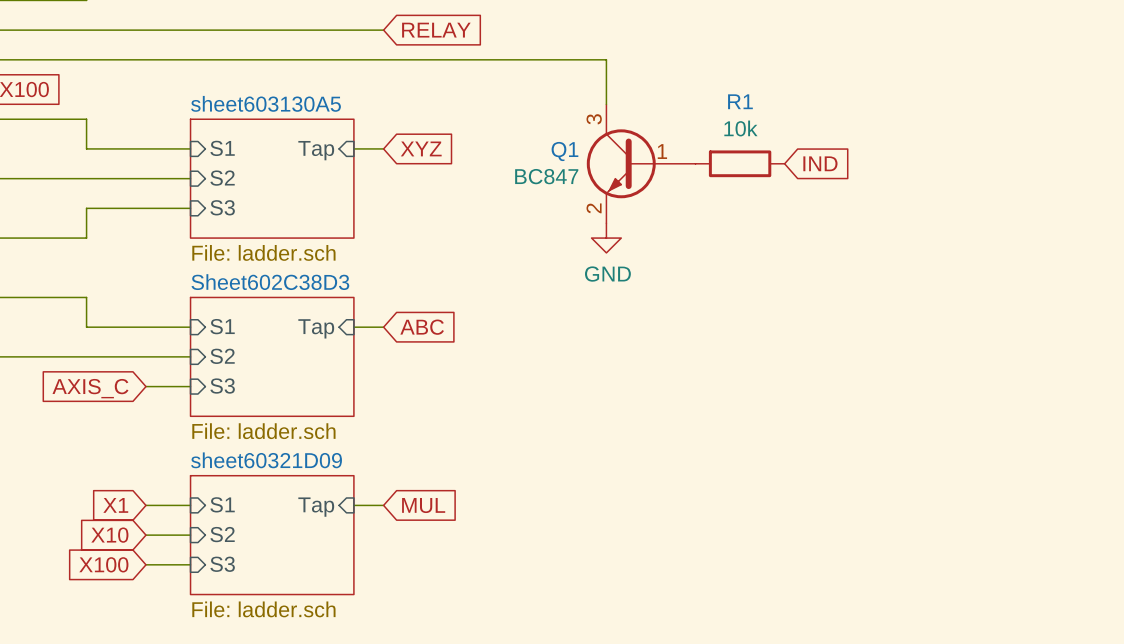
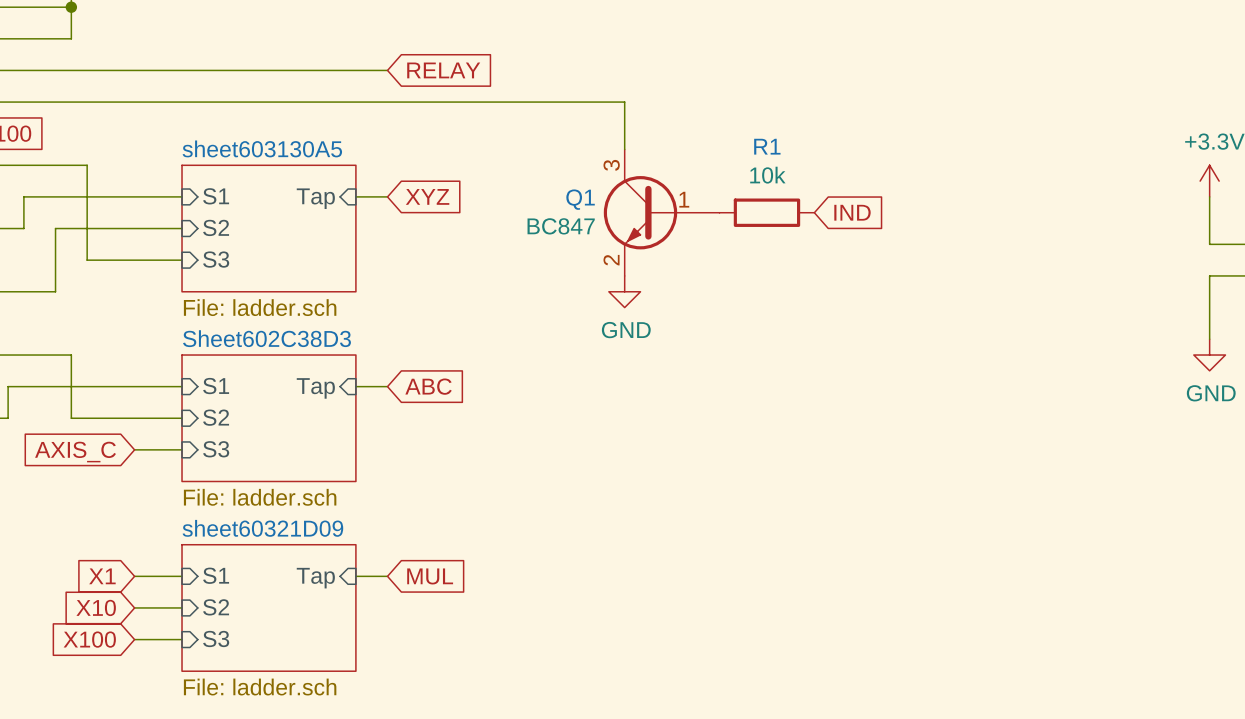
wire: (86, 119) (86, 148) -> (71, 165) (87, 165) (87, 260)
wire: (42, 178) (71, 178) -> (23, 228) (23, 196) (71, 196)
wire: (101, 208) (86, 208) (86, 238) (71, 238) -> (55, 228) (55, 291)
wire: (27, 356) (86, 356) -> (8, 418) (8, 386) (71, 386) (71, 418)

